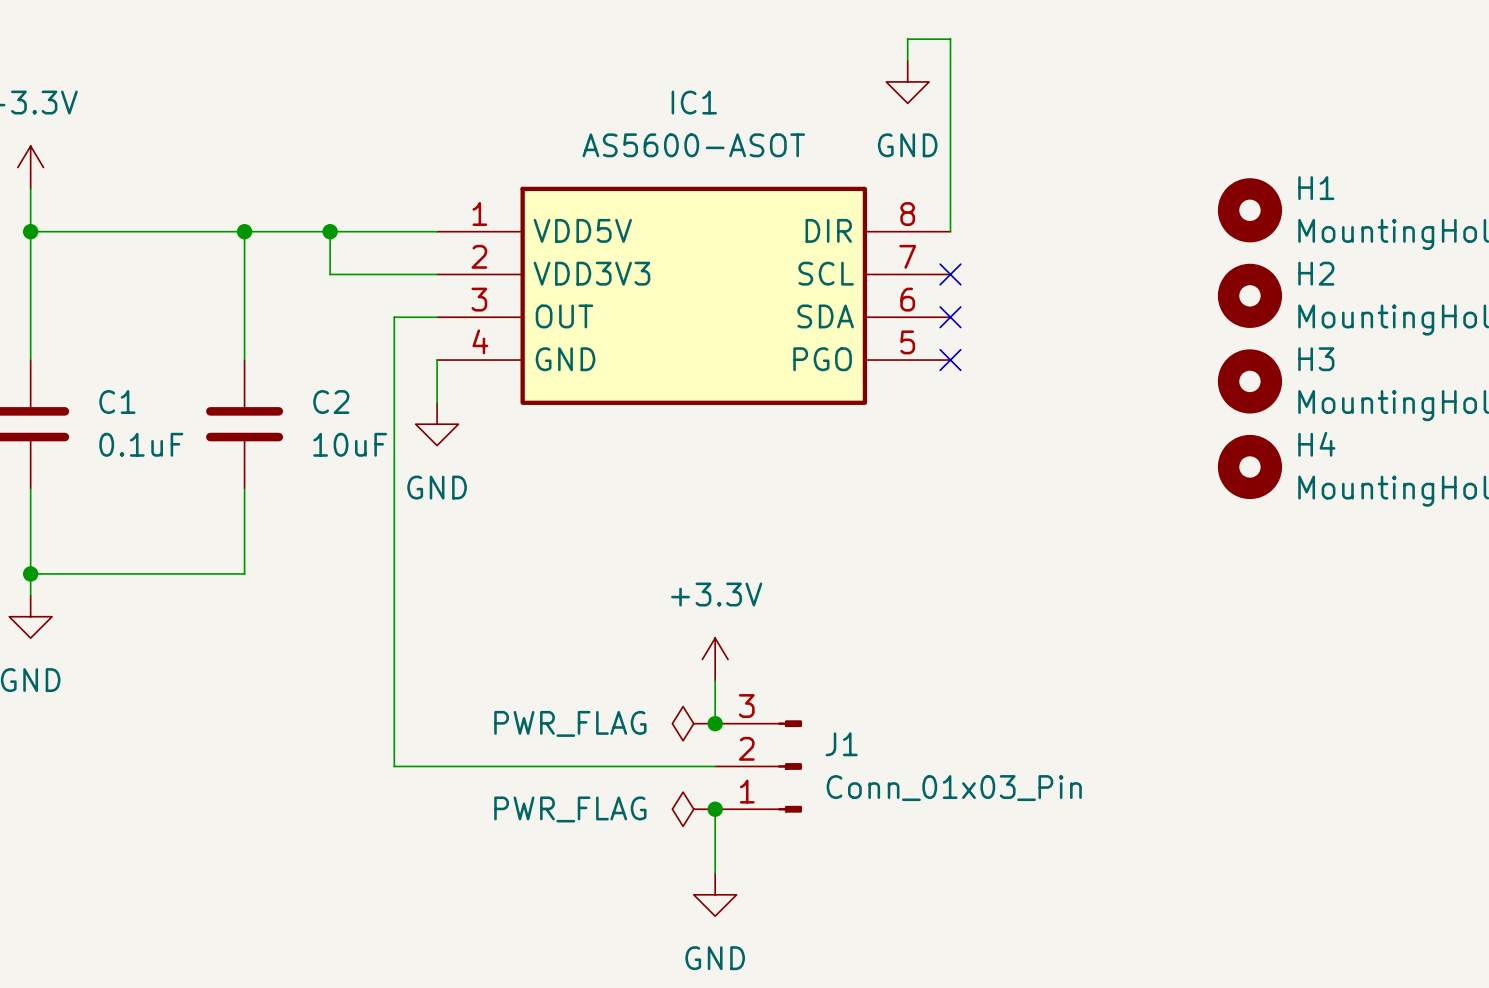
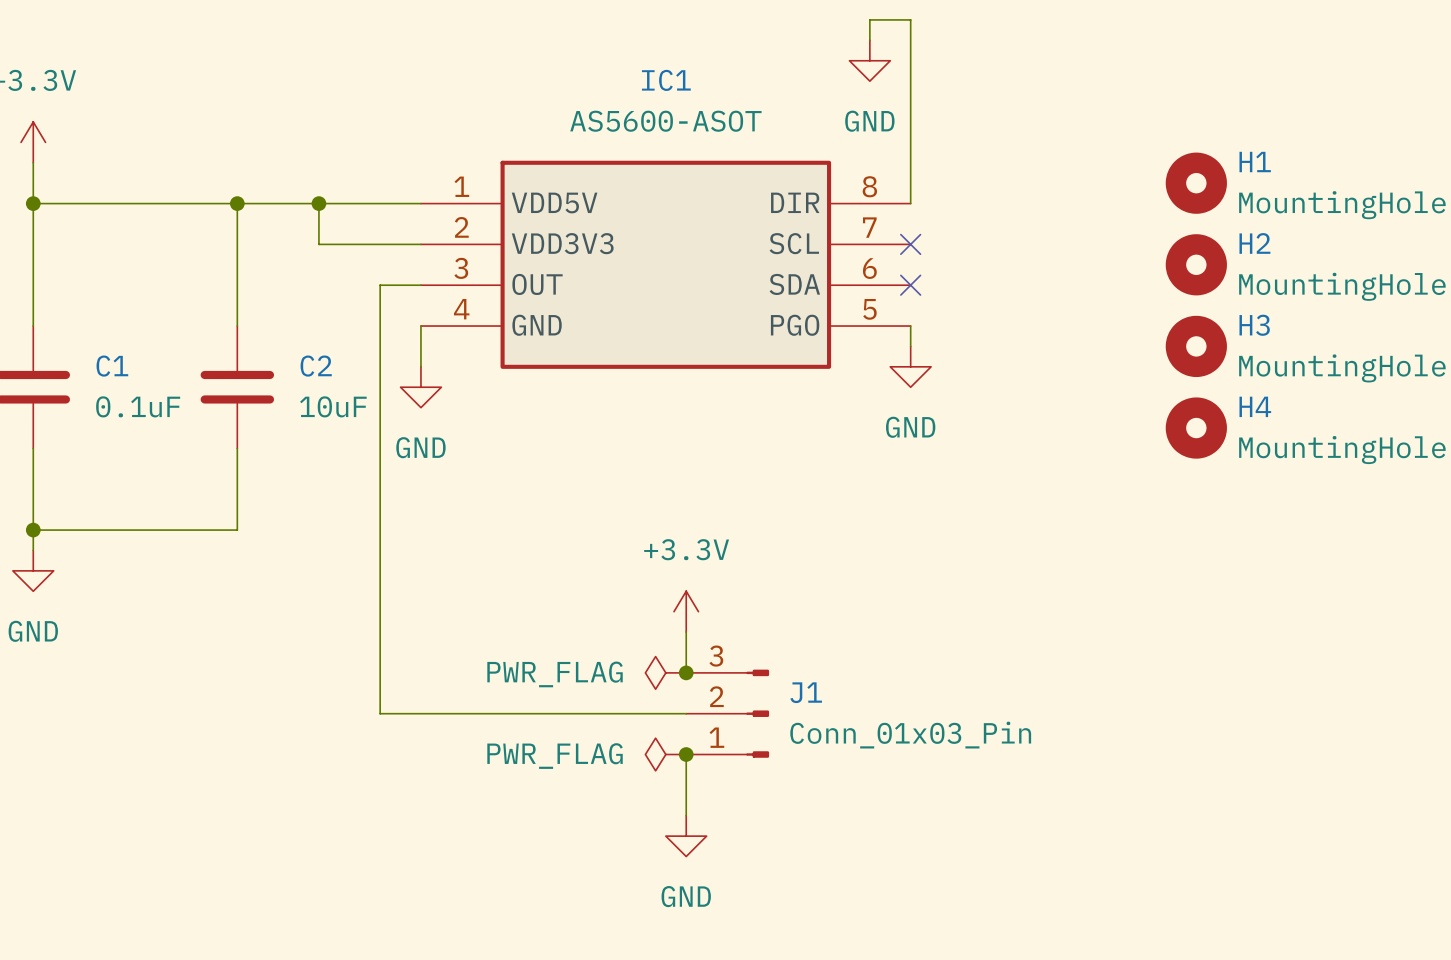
wire: none -> (910, 326) (910, 346)
no-connect mark: (950, 360) -> none
power symbol: none -> GND (910, 366)

